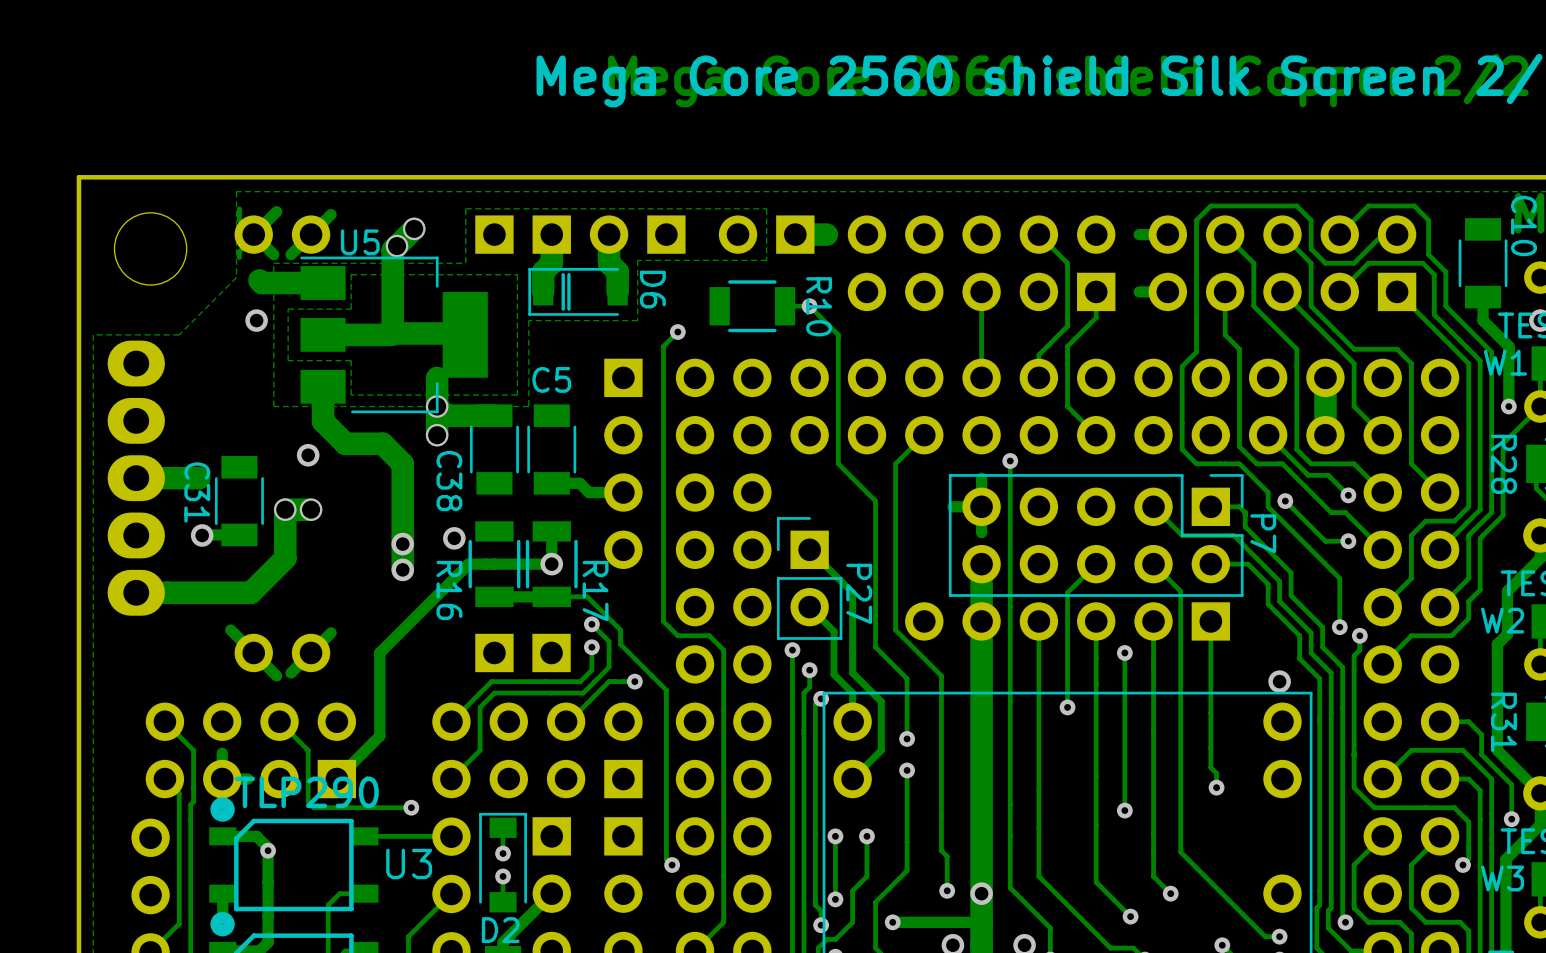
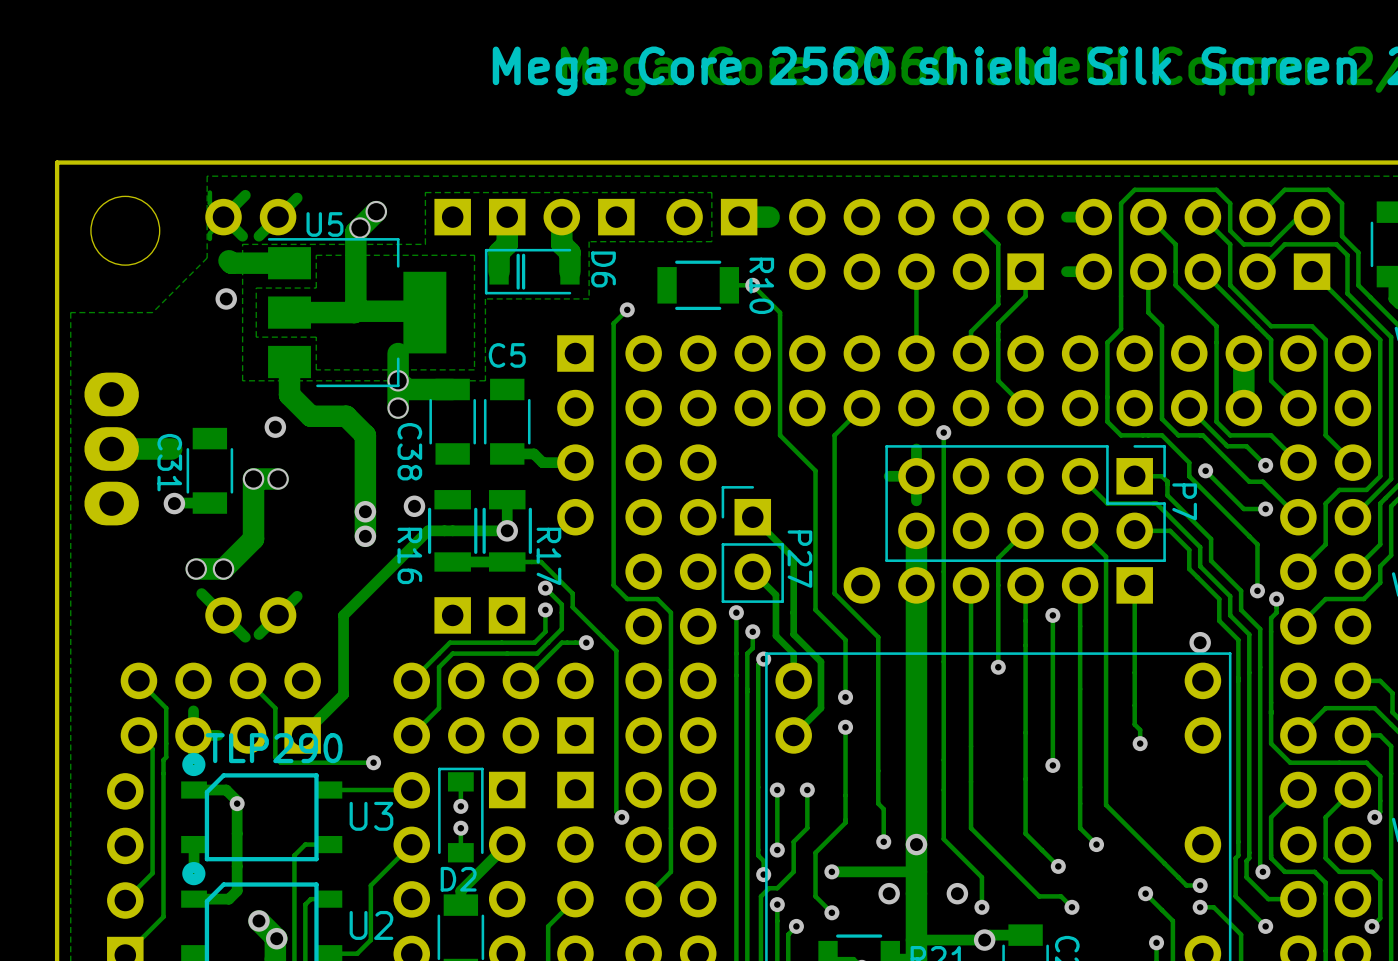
part footprint: [107, 340, 165, 616] -> [84, 372, 139, 526]
track: (285, 558) (250, 592) (136, 592) -> (253, 525) (253, 539) (223, 569) (196, 569)
via: none -> (196, 569)
via: none -> (223, 569)

